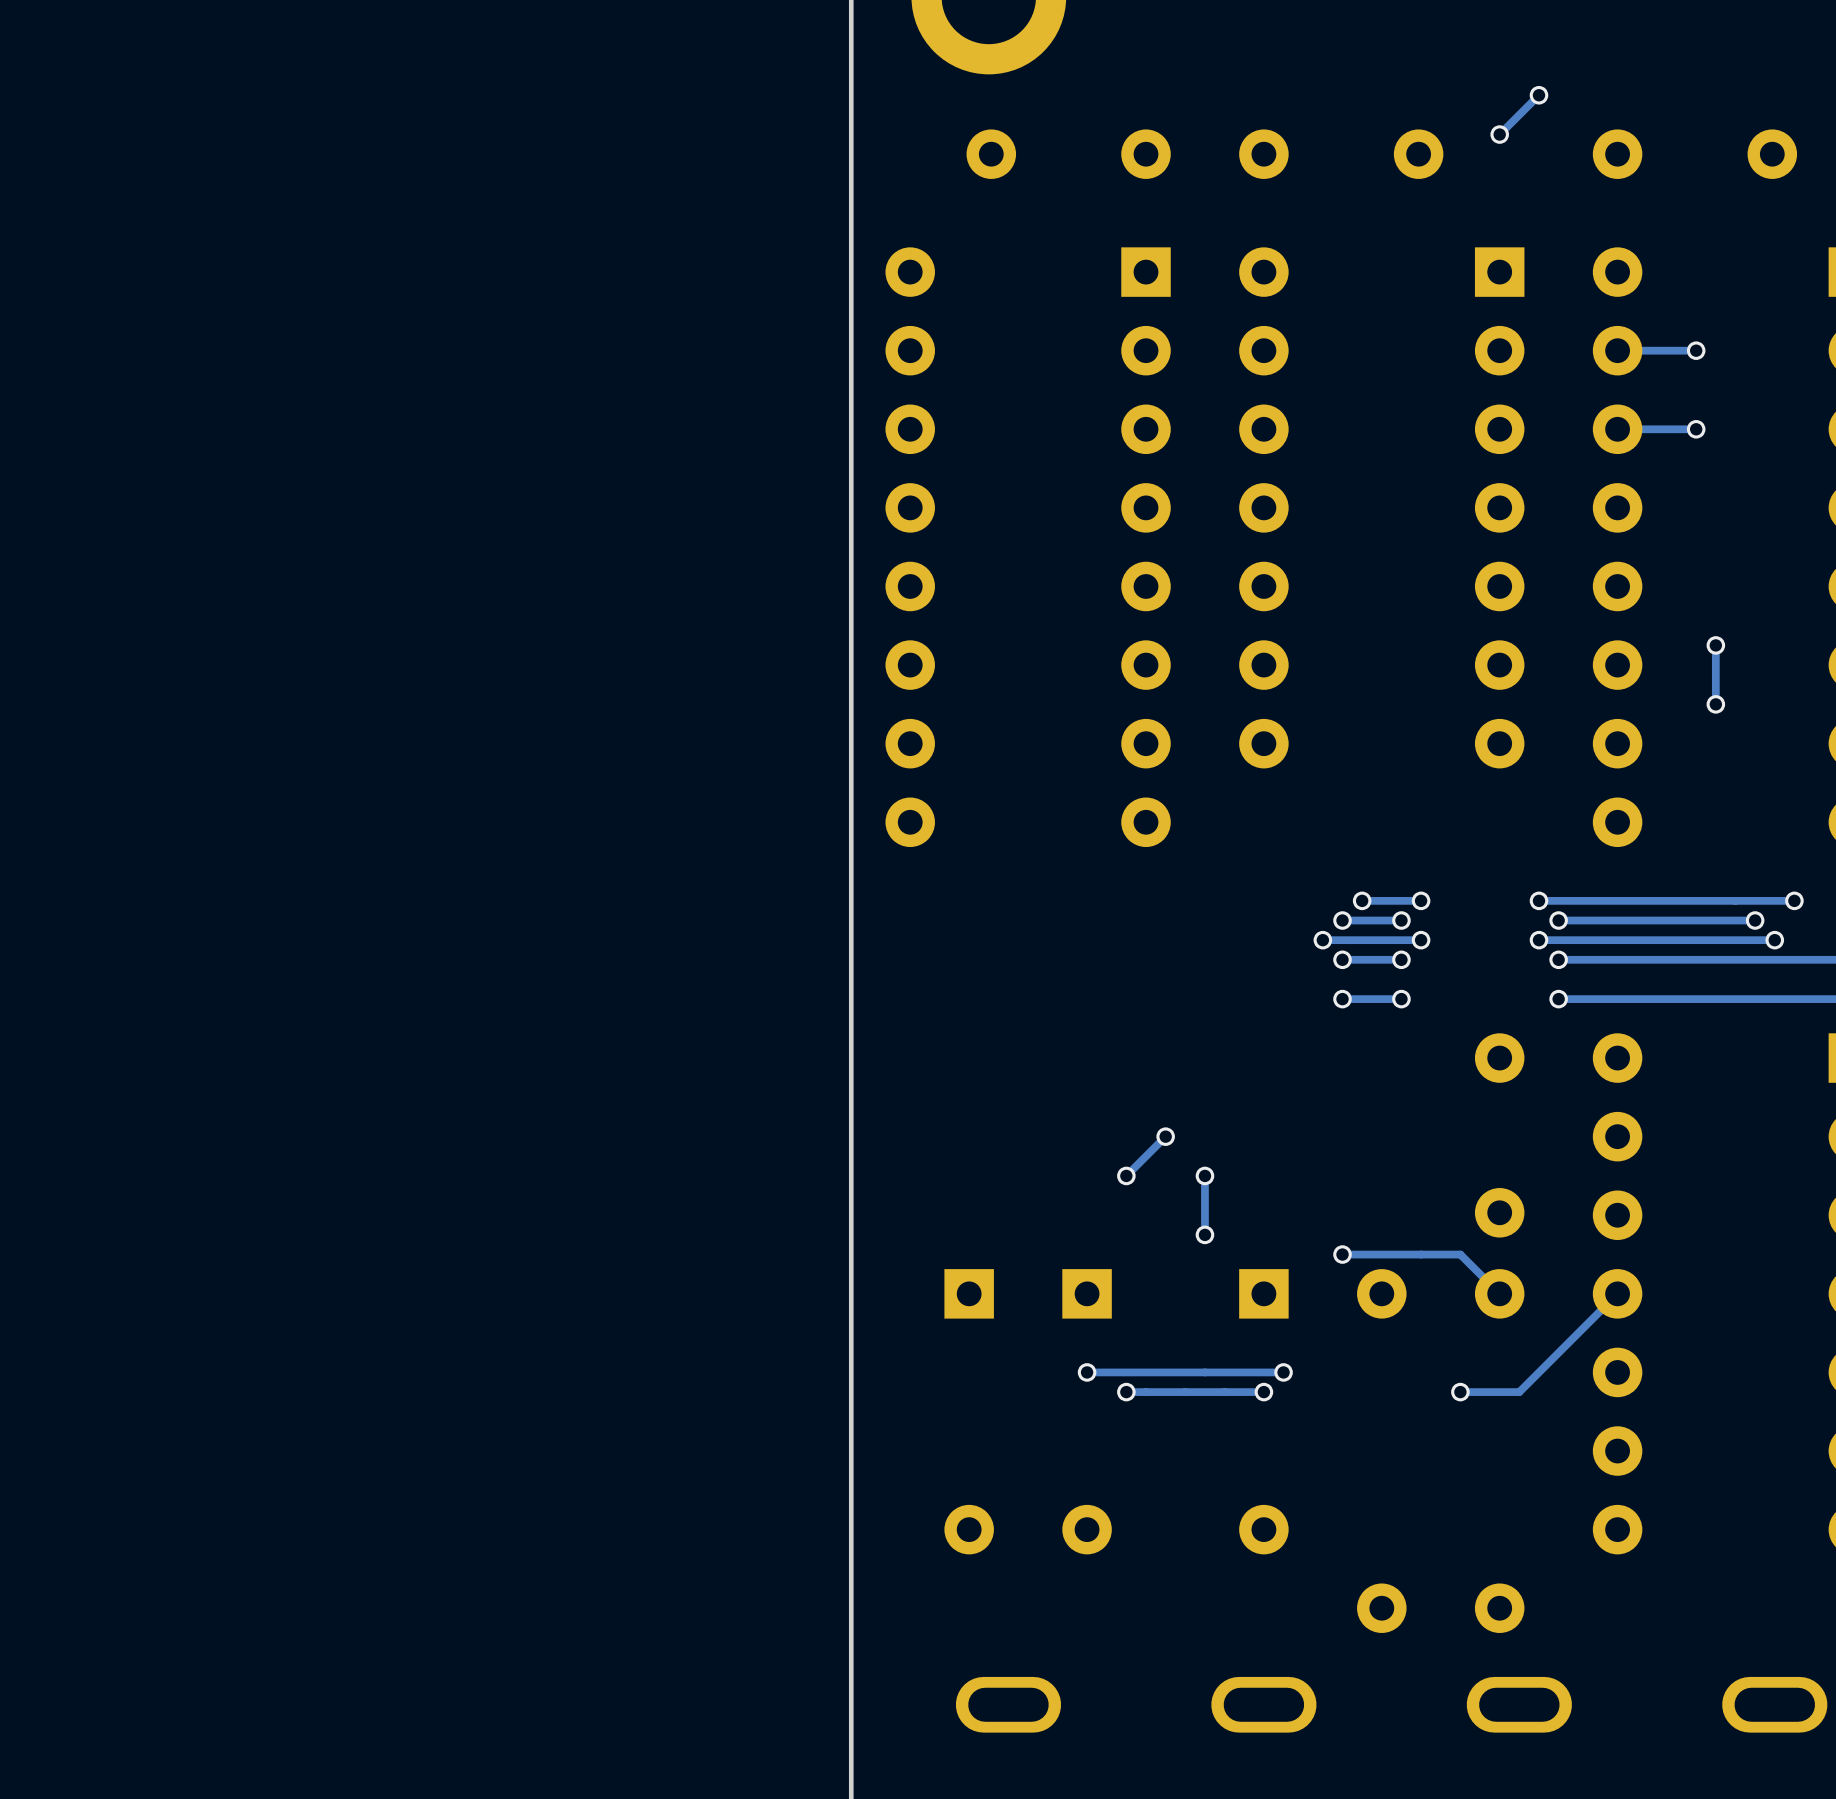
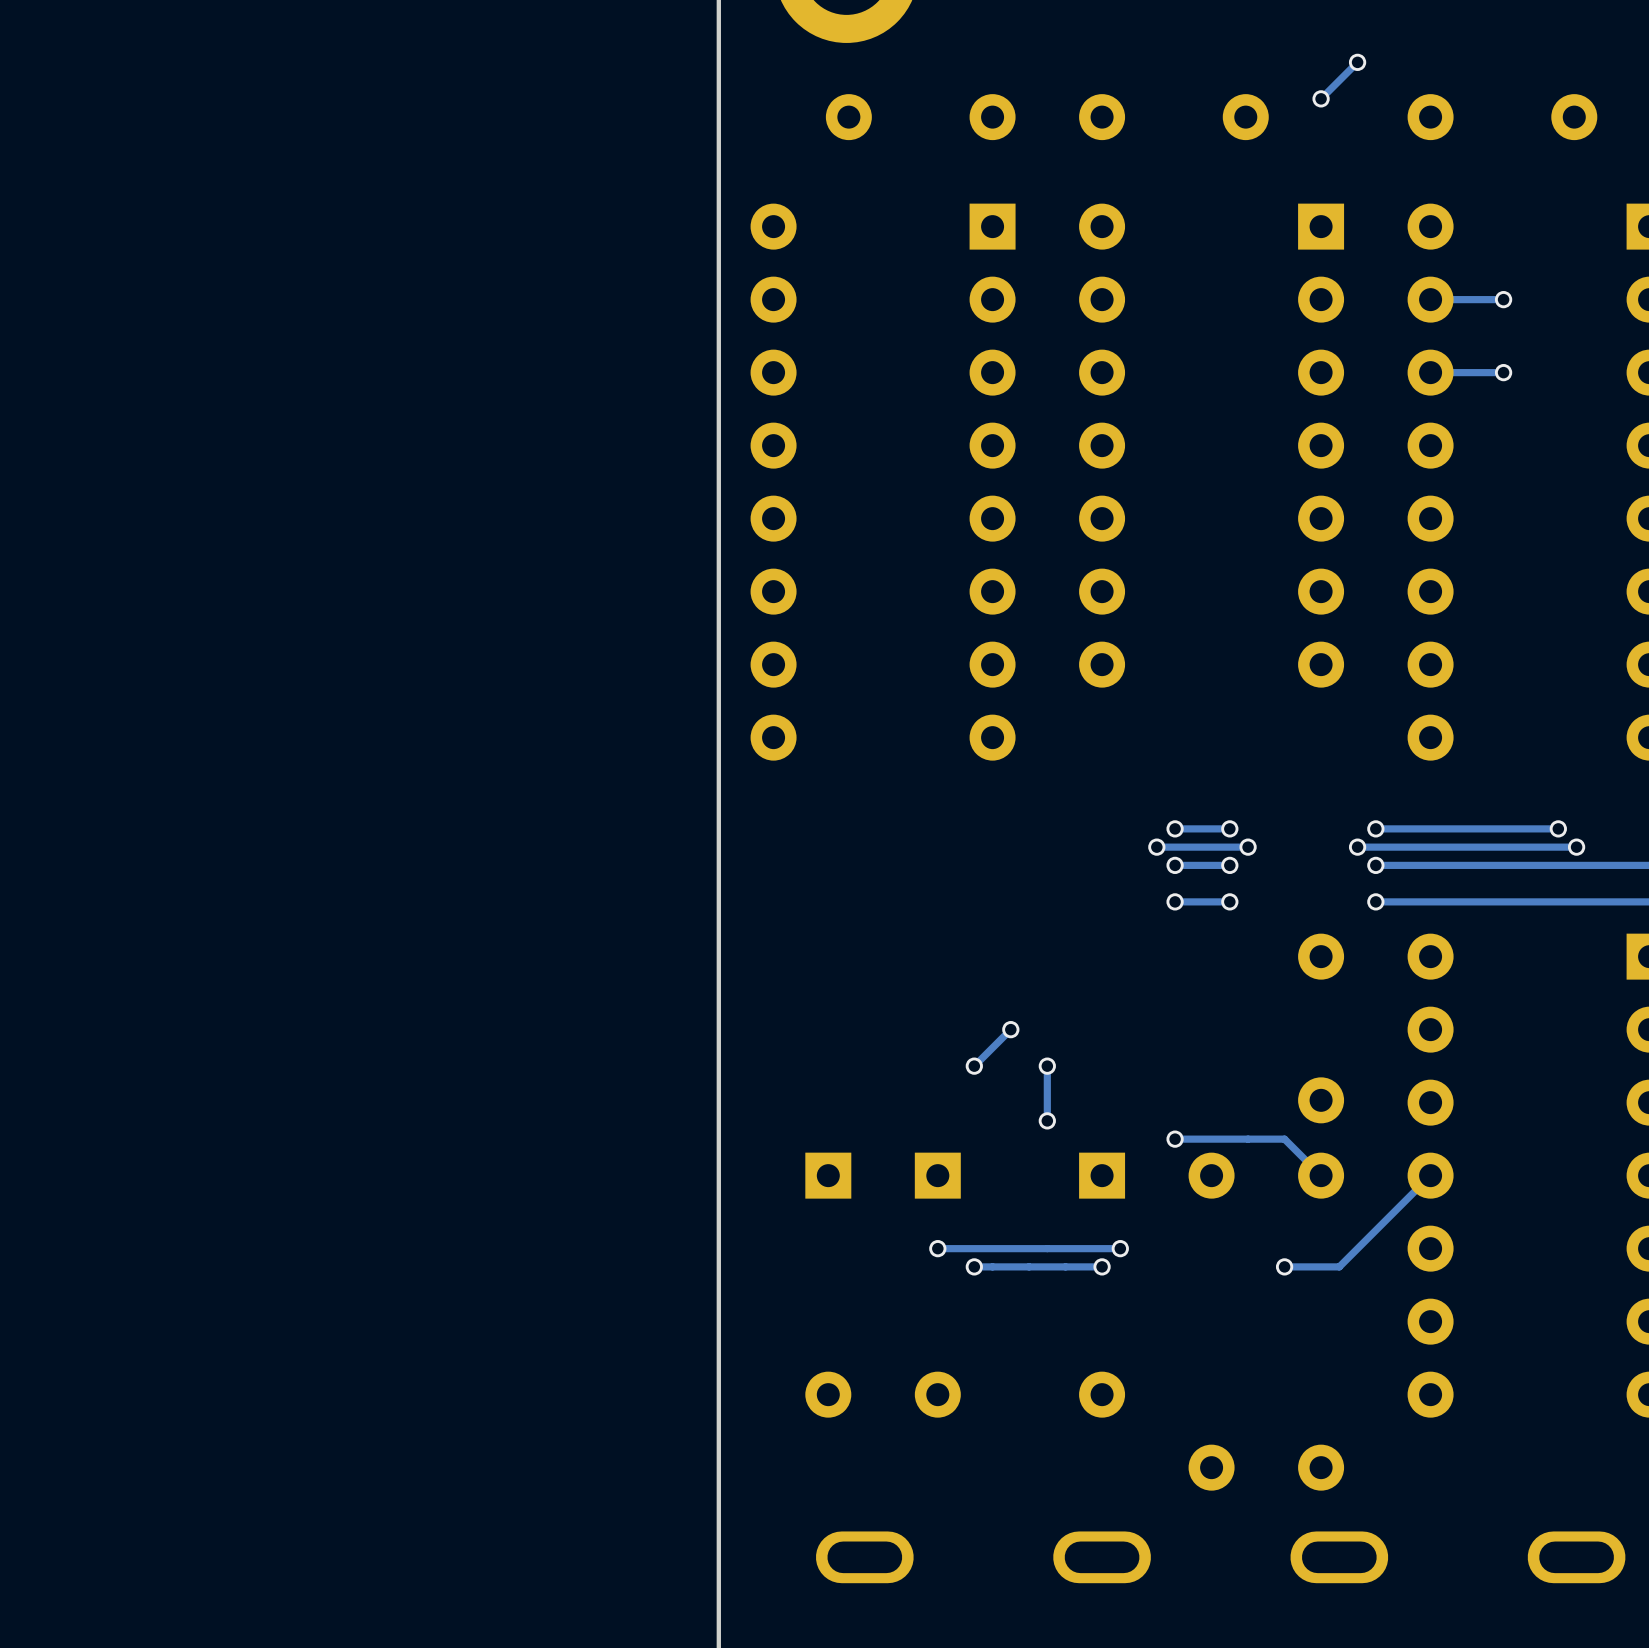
track: (1715, 645) (1715, 704) -> none
via: (1715, 645) -> none
via: (1715, 704) -> none
via: (1362, 900) -> none
track: (1421, 900) (1362, 900) -> none
via: (1421, 900) -> none
via: (1538, 900) -> none
track: (1794, 900) (1538, 900) -> none
via: (1794, 900) -> none

